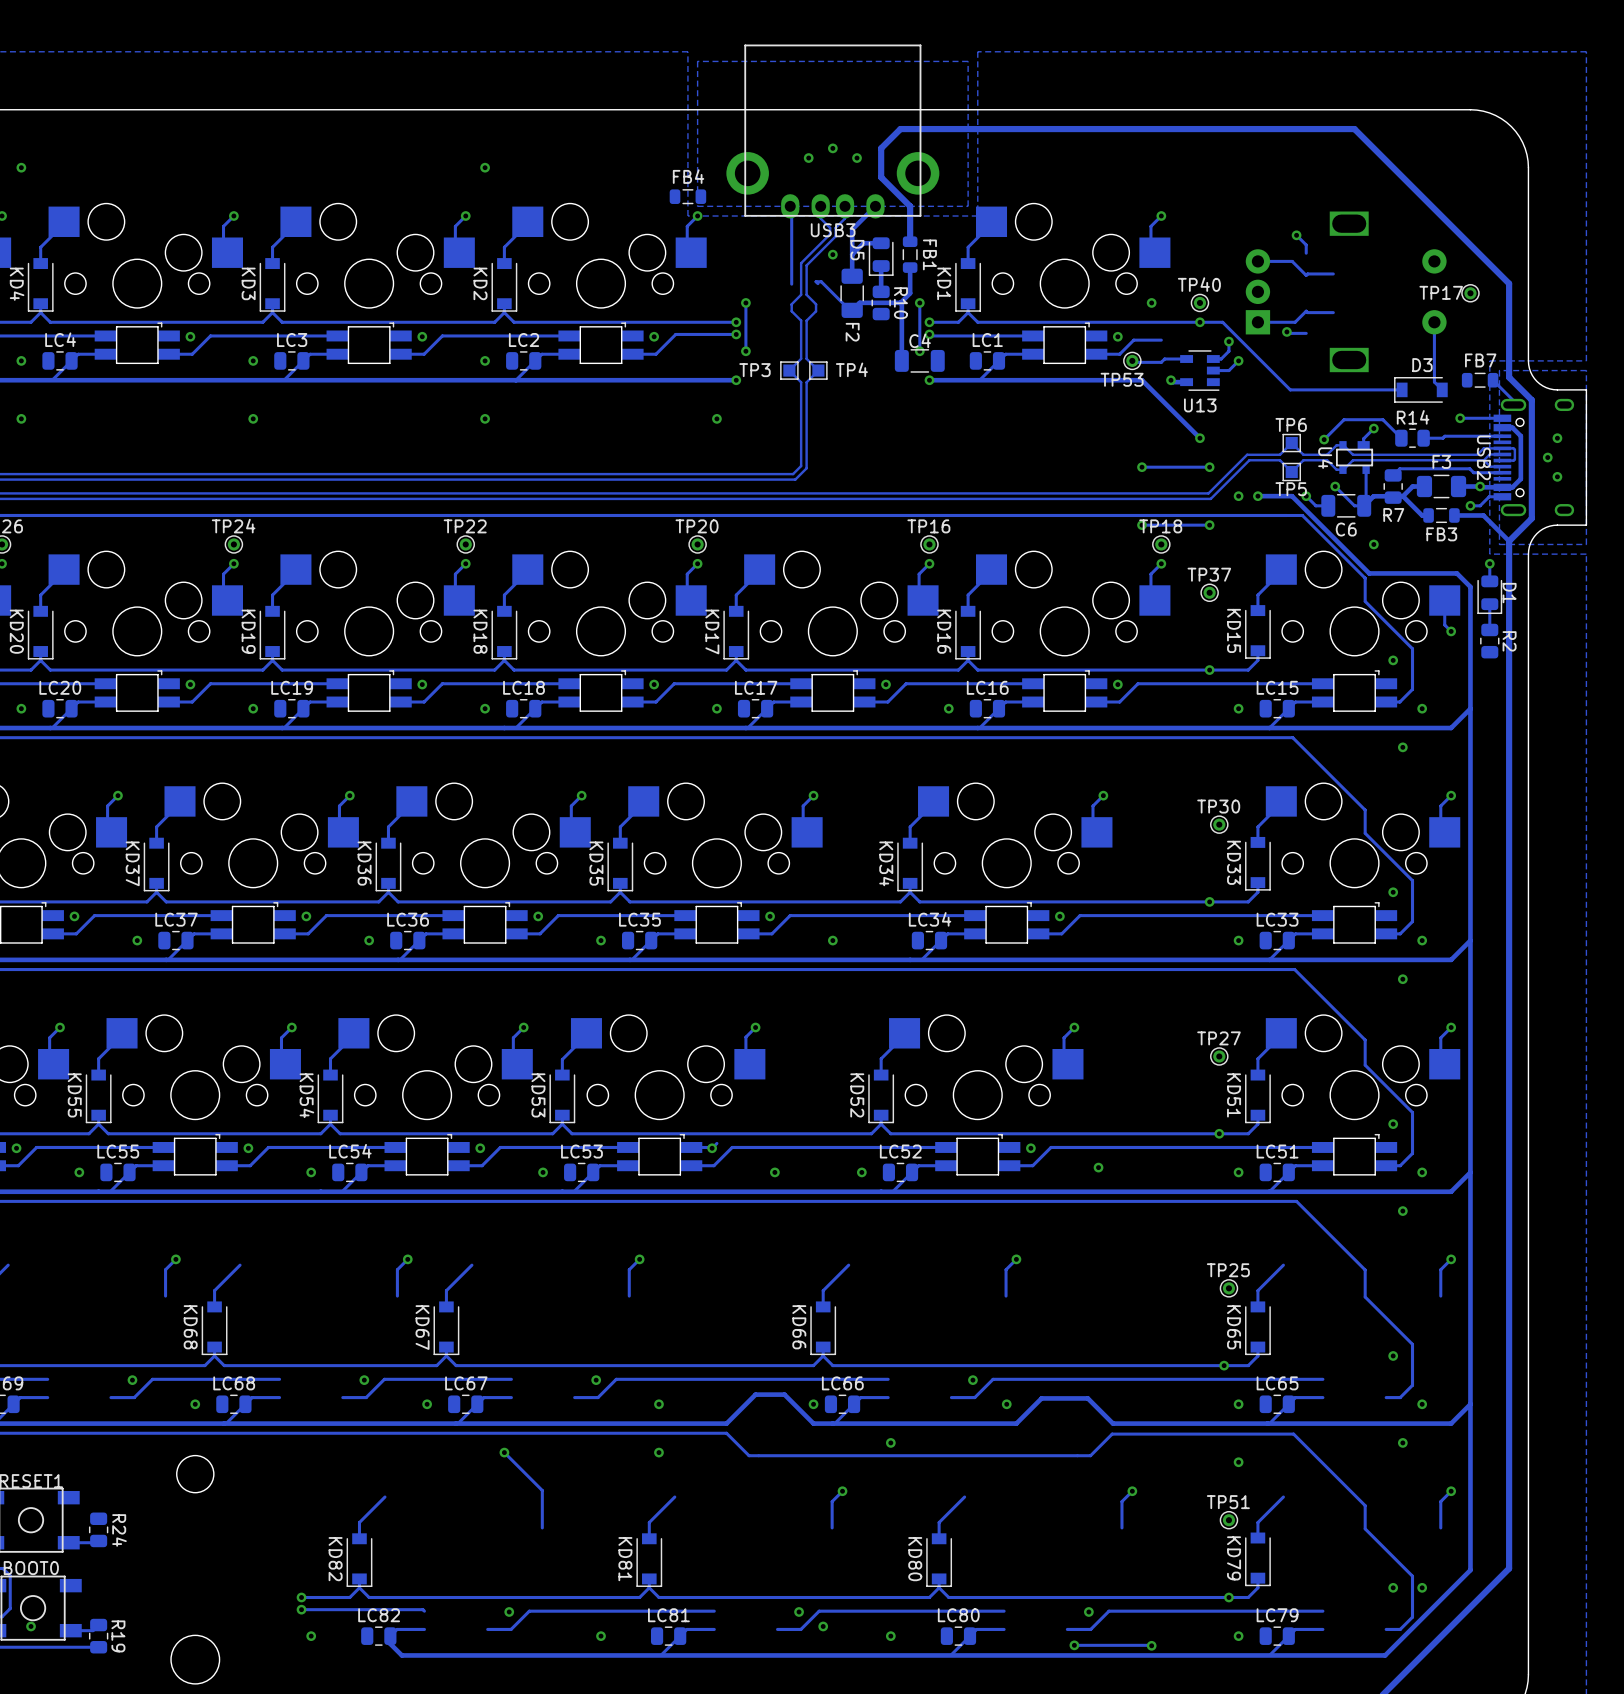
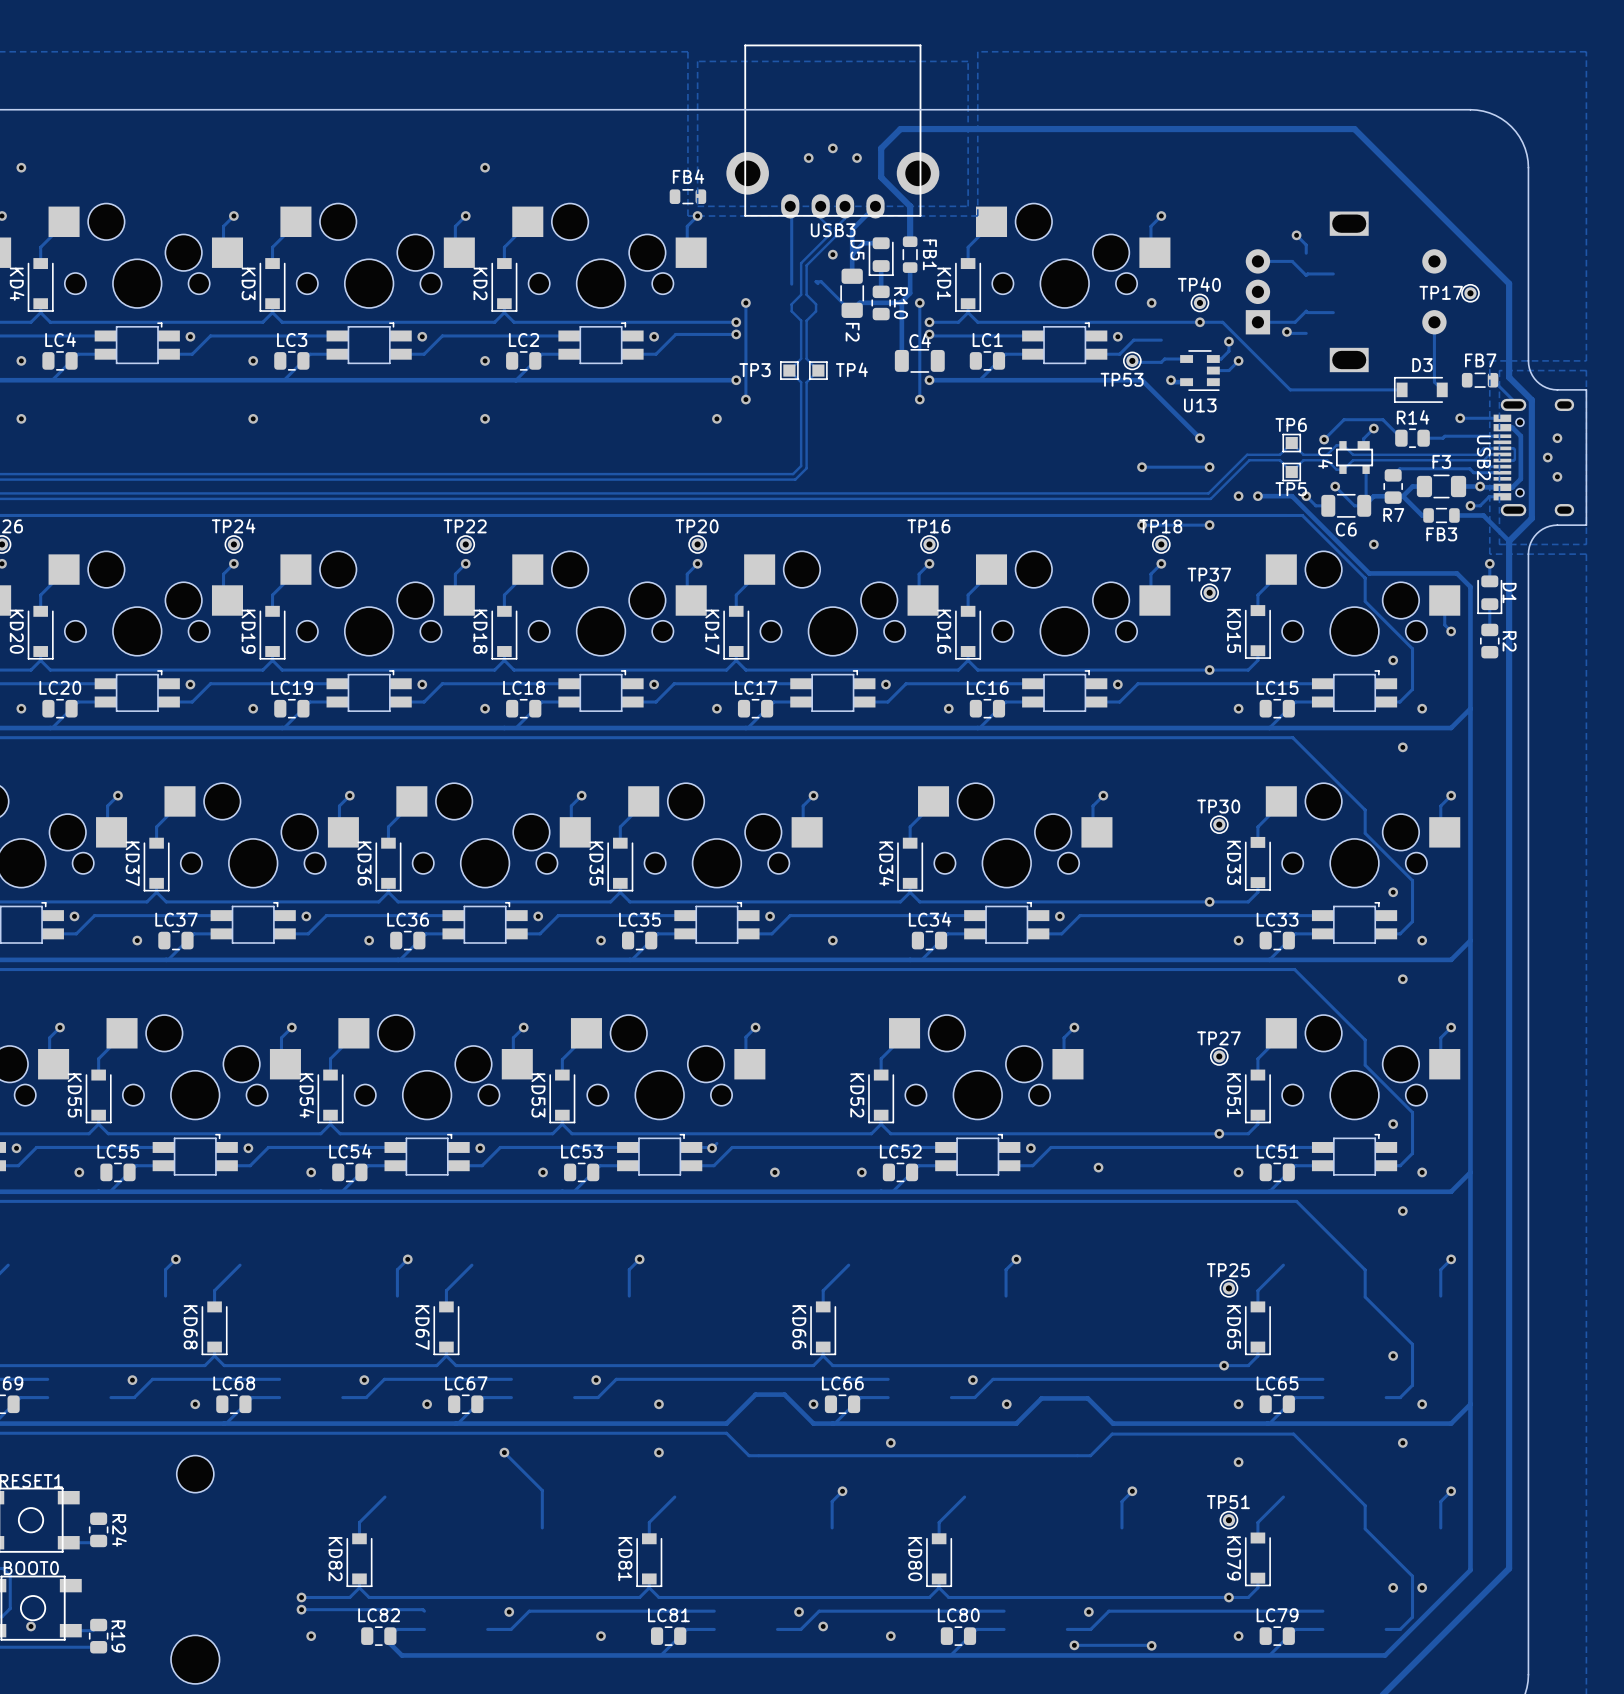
track: none -> (745, 351) (745, 399)
via position: (745, 351) -> (745, 399)
track: none -> (919, 351) (919, 399)
via position: (919, 351) -> (919, 399)

